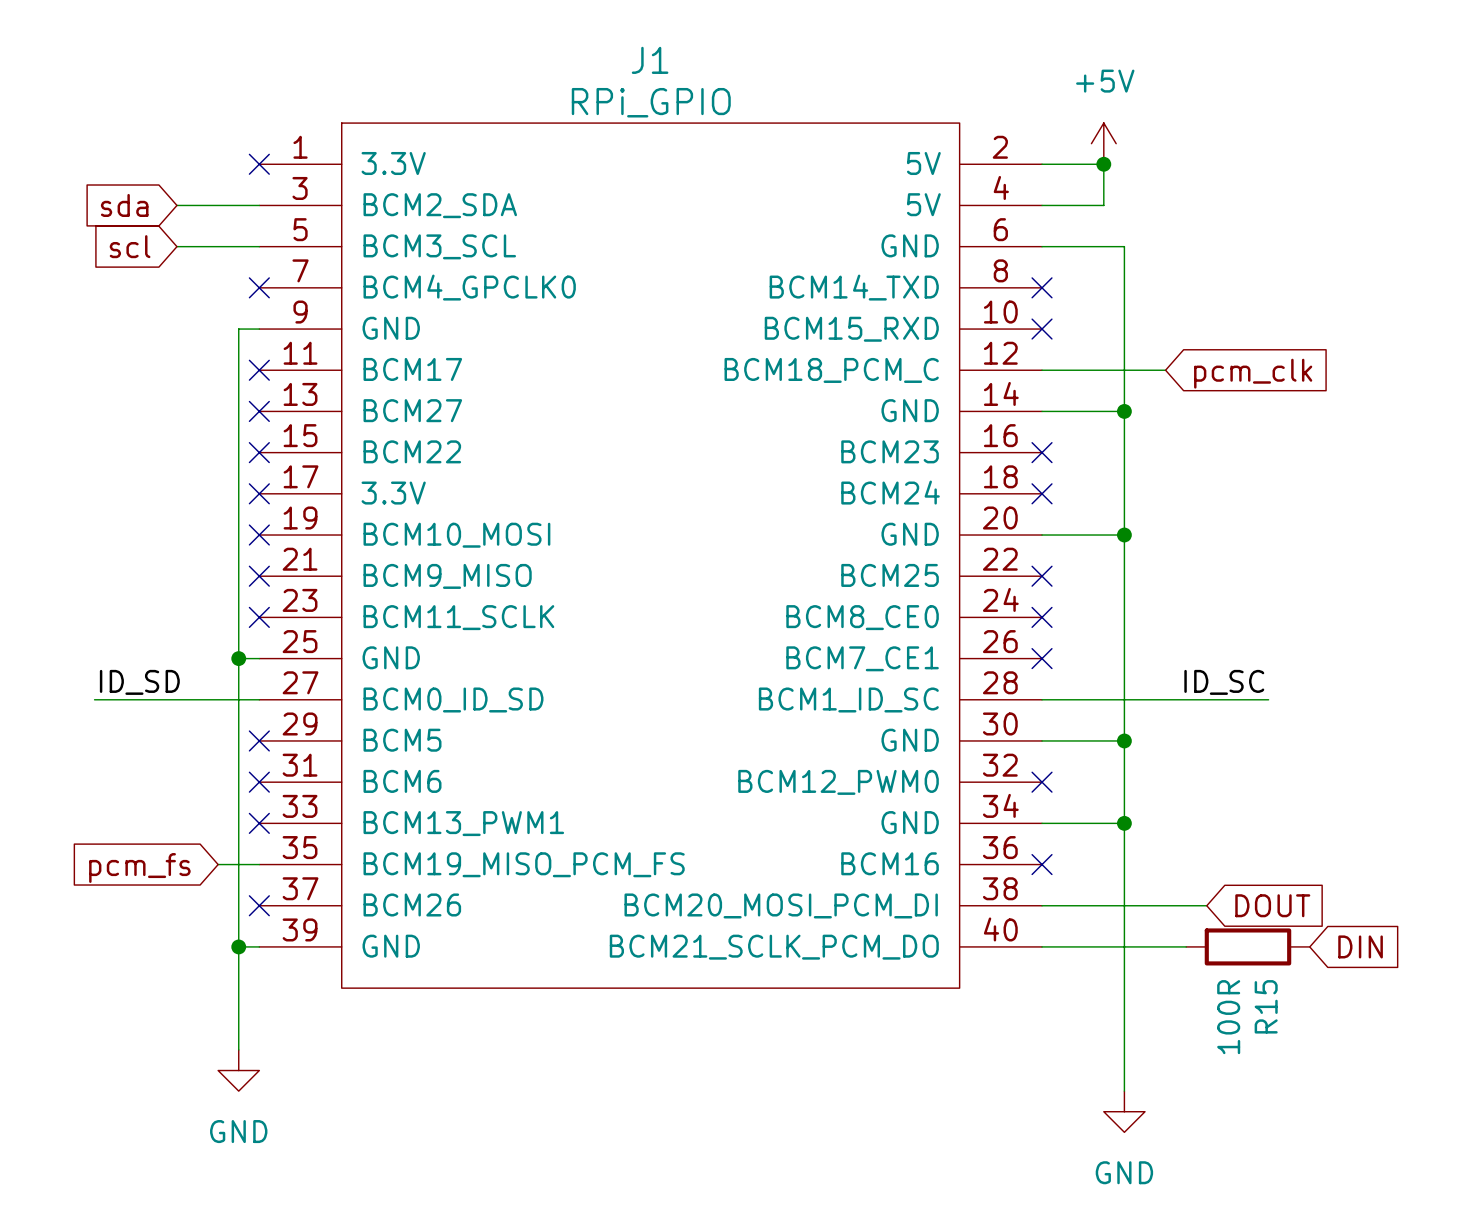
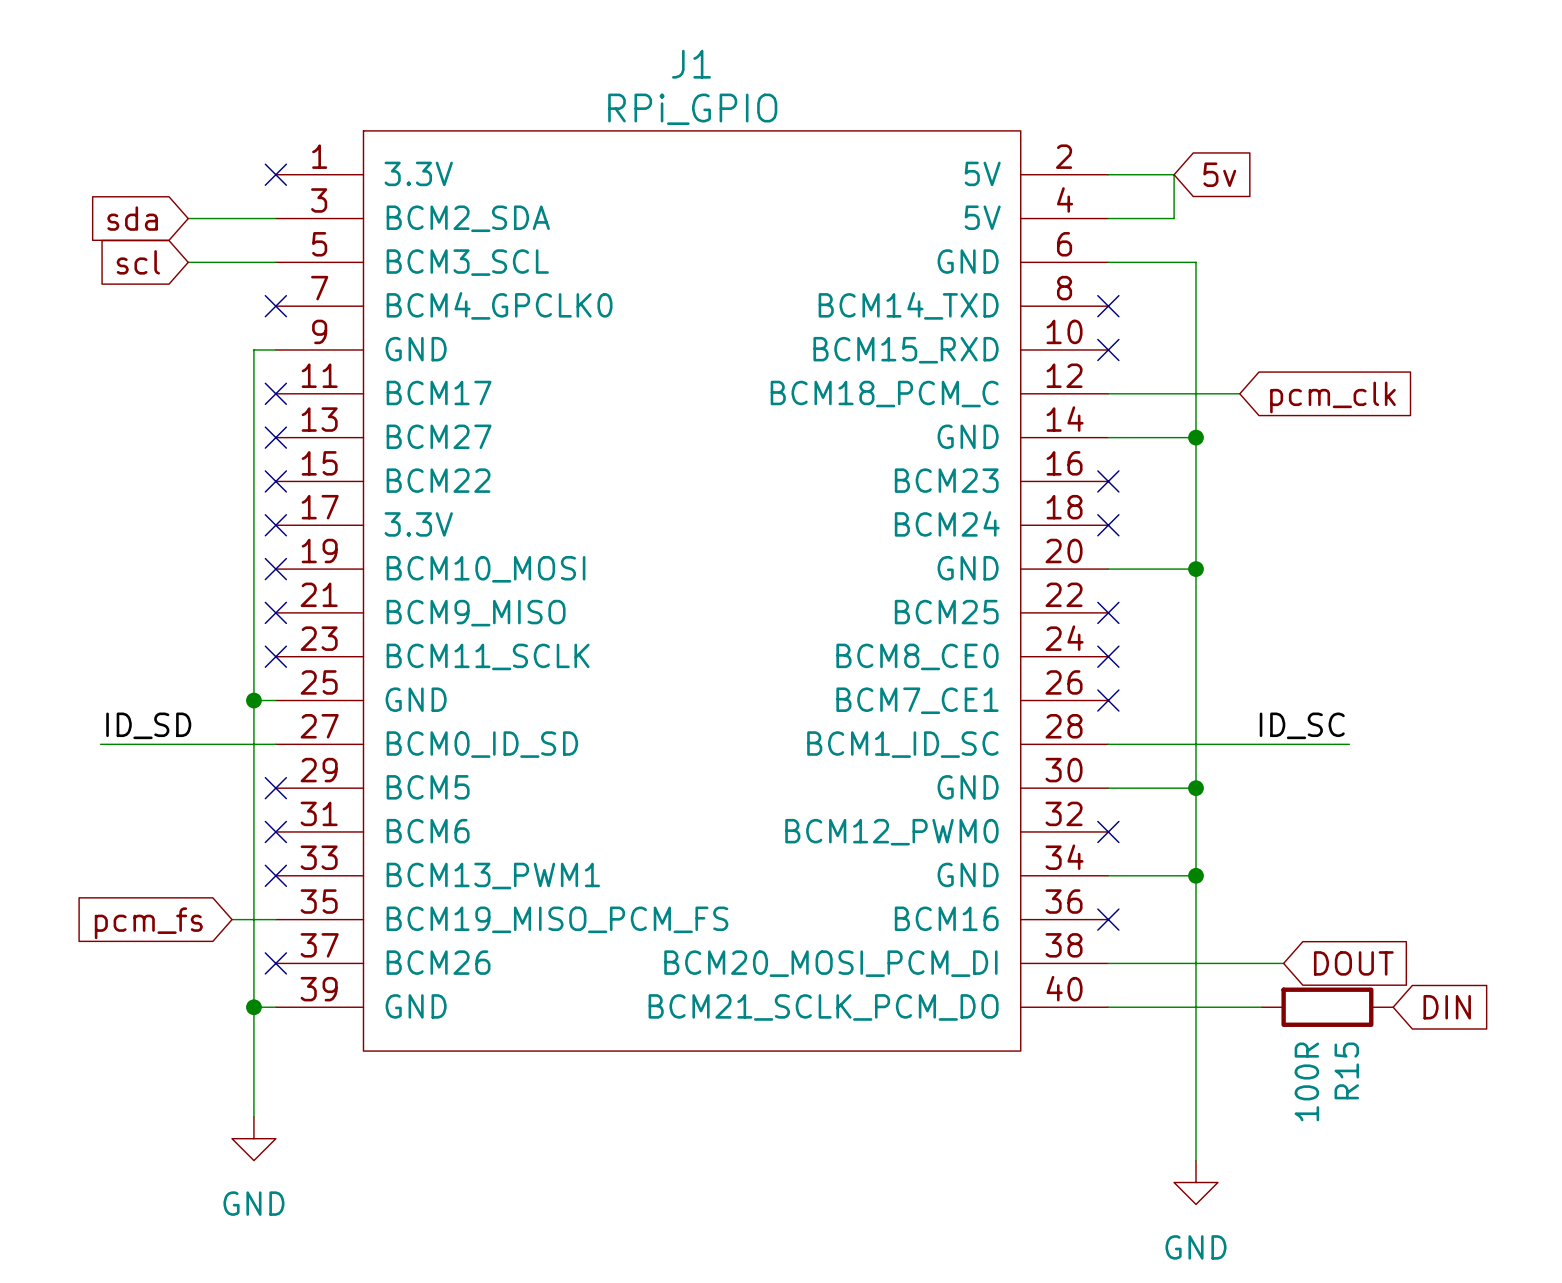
power symbol: +5V (1103, 143) -> none
junction: (1103, 164) -> none
global label: none -> 5v (1219, 174)

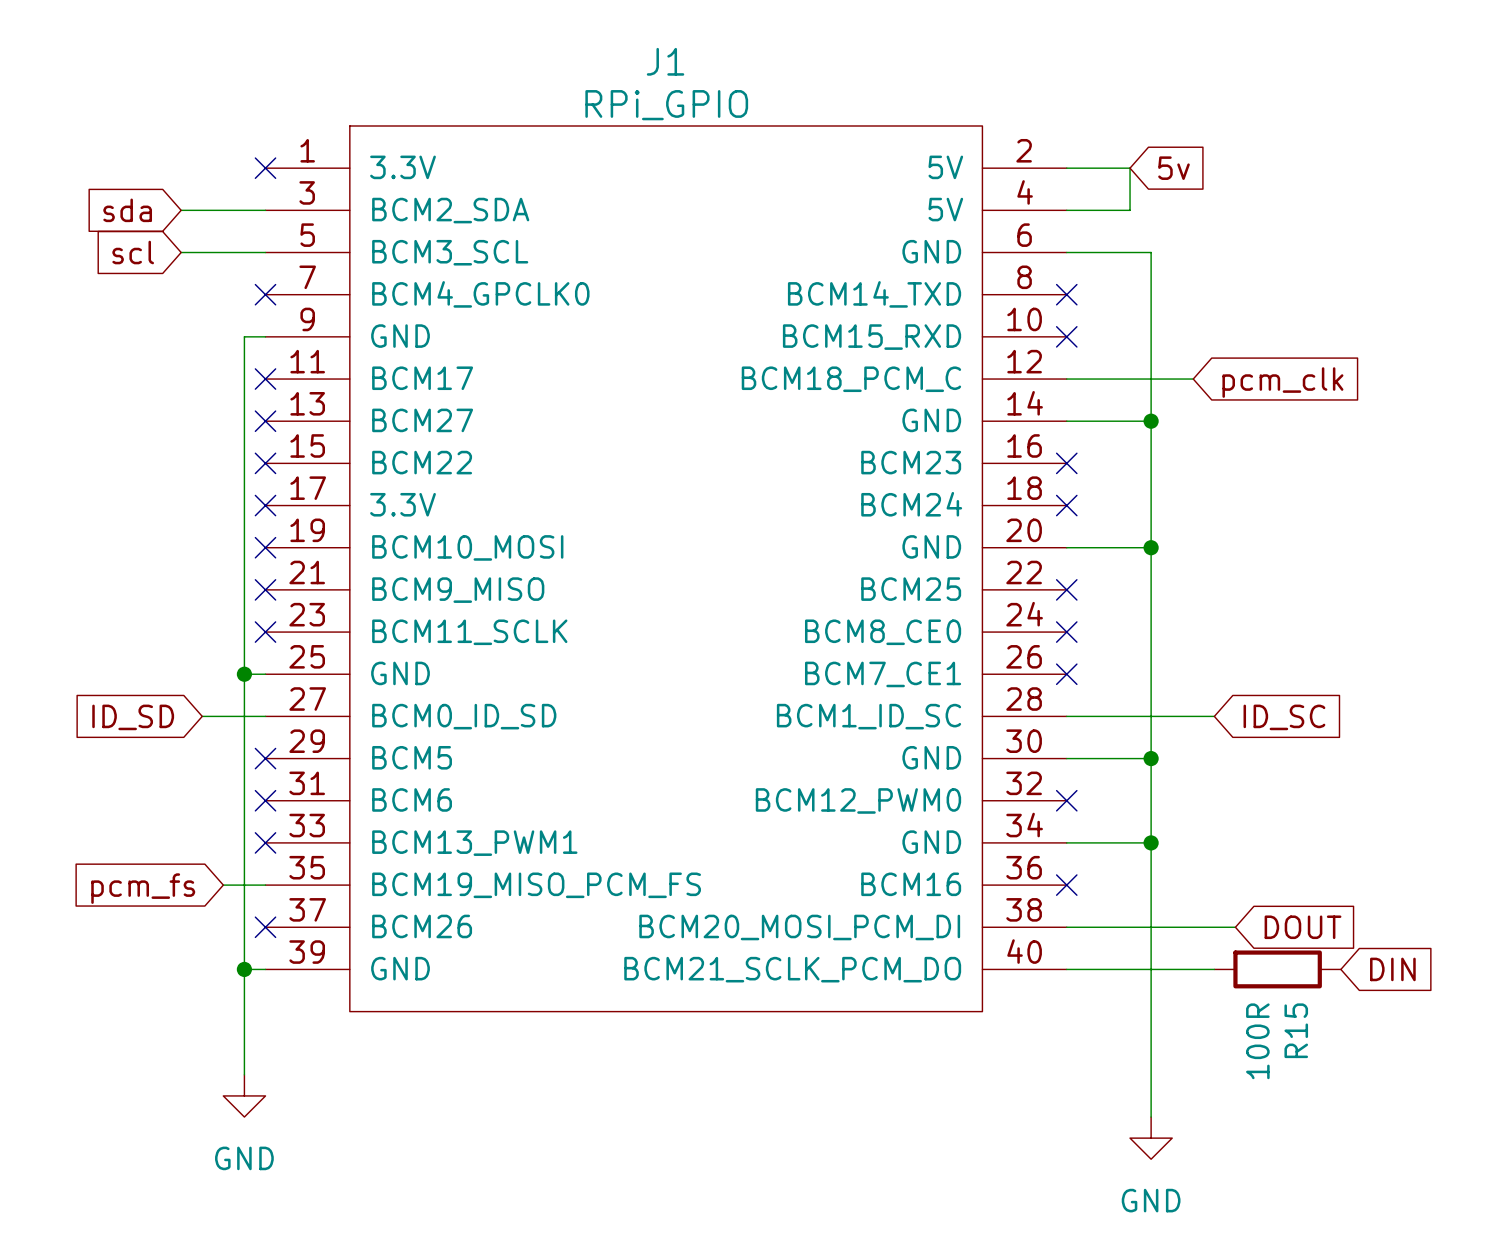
label: ID_SD (148, 725) -> none
label: ID_SC (1302, 725) -> none
wire: (100, 744) (210, 744) -> none
wire: (1261, 744) (1349, 744) -> none
global label: none -> ID_SD (133, 717)
global label: none -> ID_SC (1284, 717)

